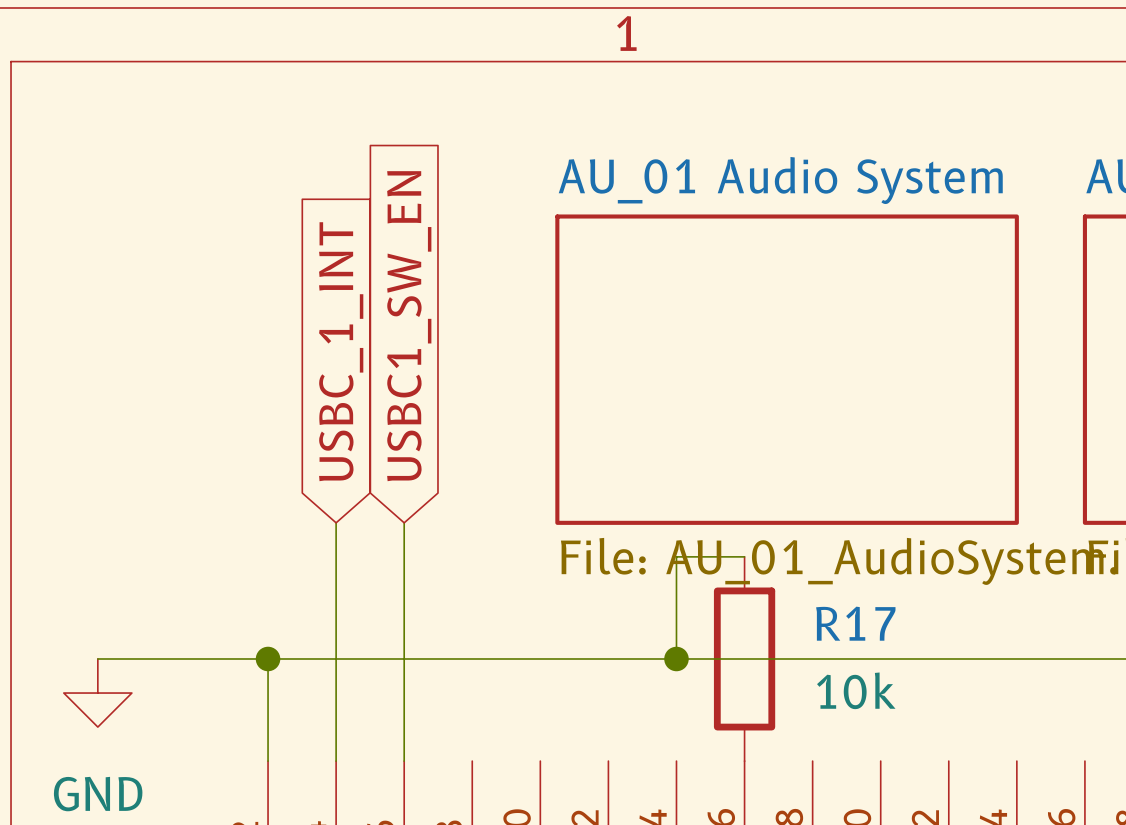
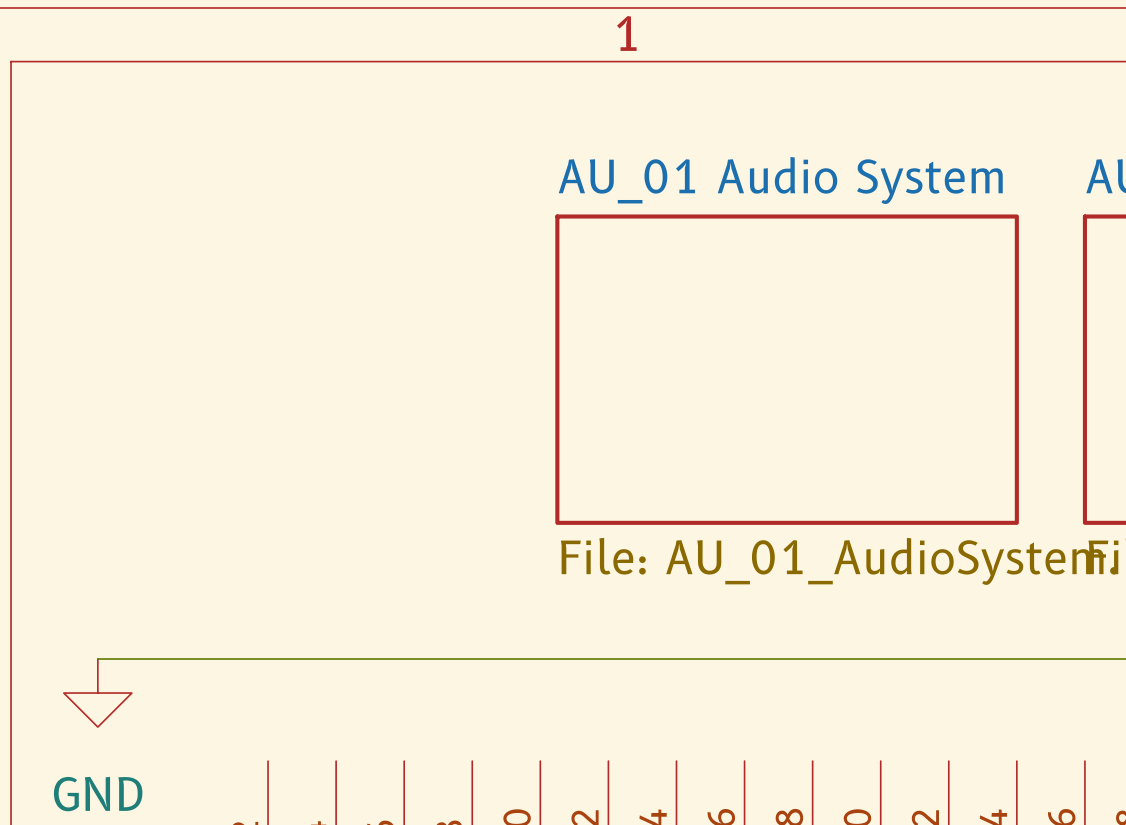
global label: USBC1_SW_EN (409, 326) -> none
global label: USBC_1_INT (341, 351) -> none
wire: (336, 522) (336, 761) -> none
wire: (404, 522) (404, 761) -> none
wire: (744, 556) (676, 556) (676, 658) -> none
wire: (268, 658) (268, 761) -> none
junction: (268, 658) -> none
junction: (676, 658) -> none
R17: 10k (744, 658) -> none

